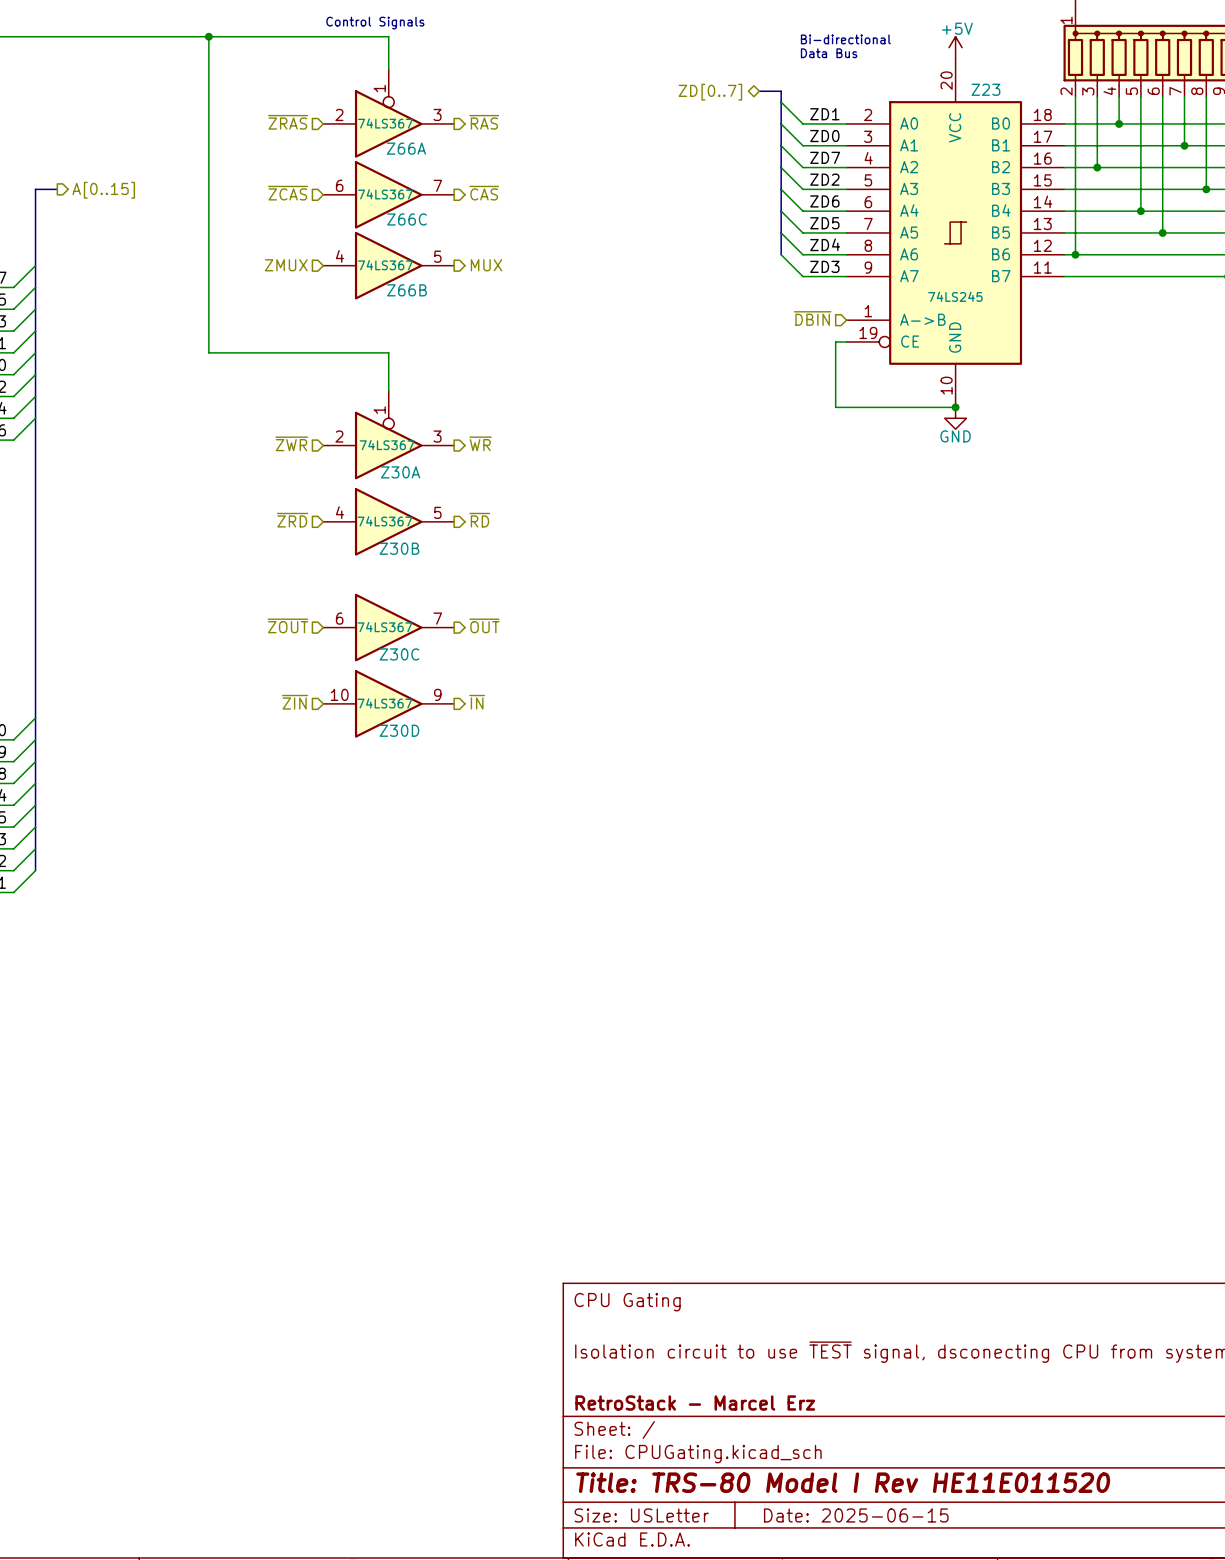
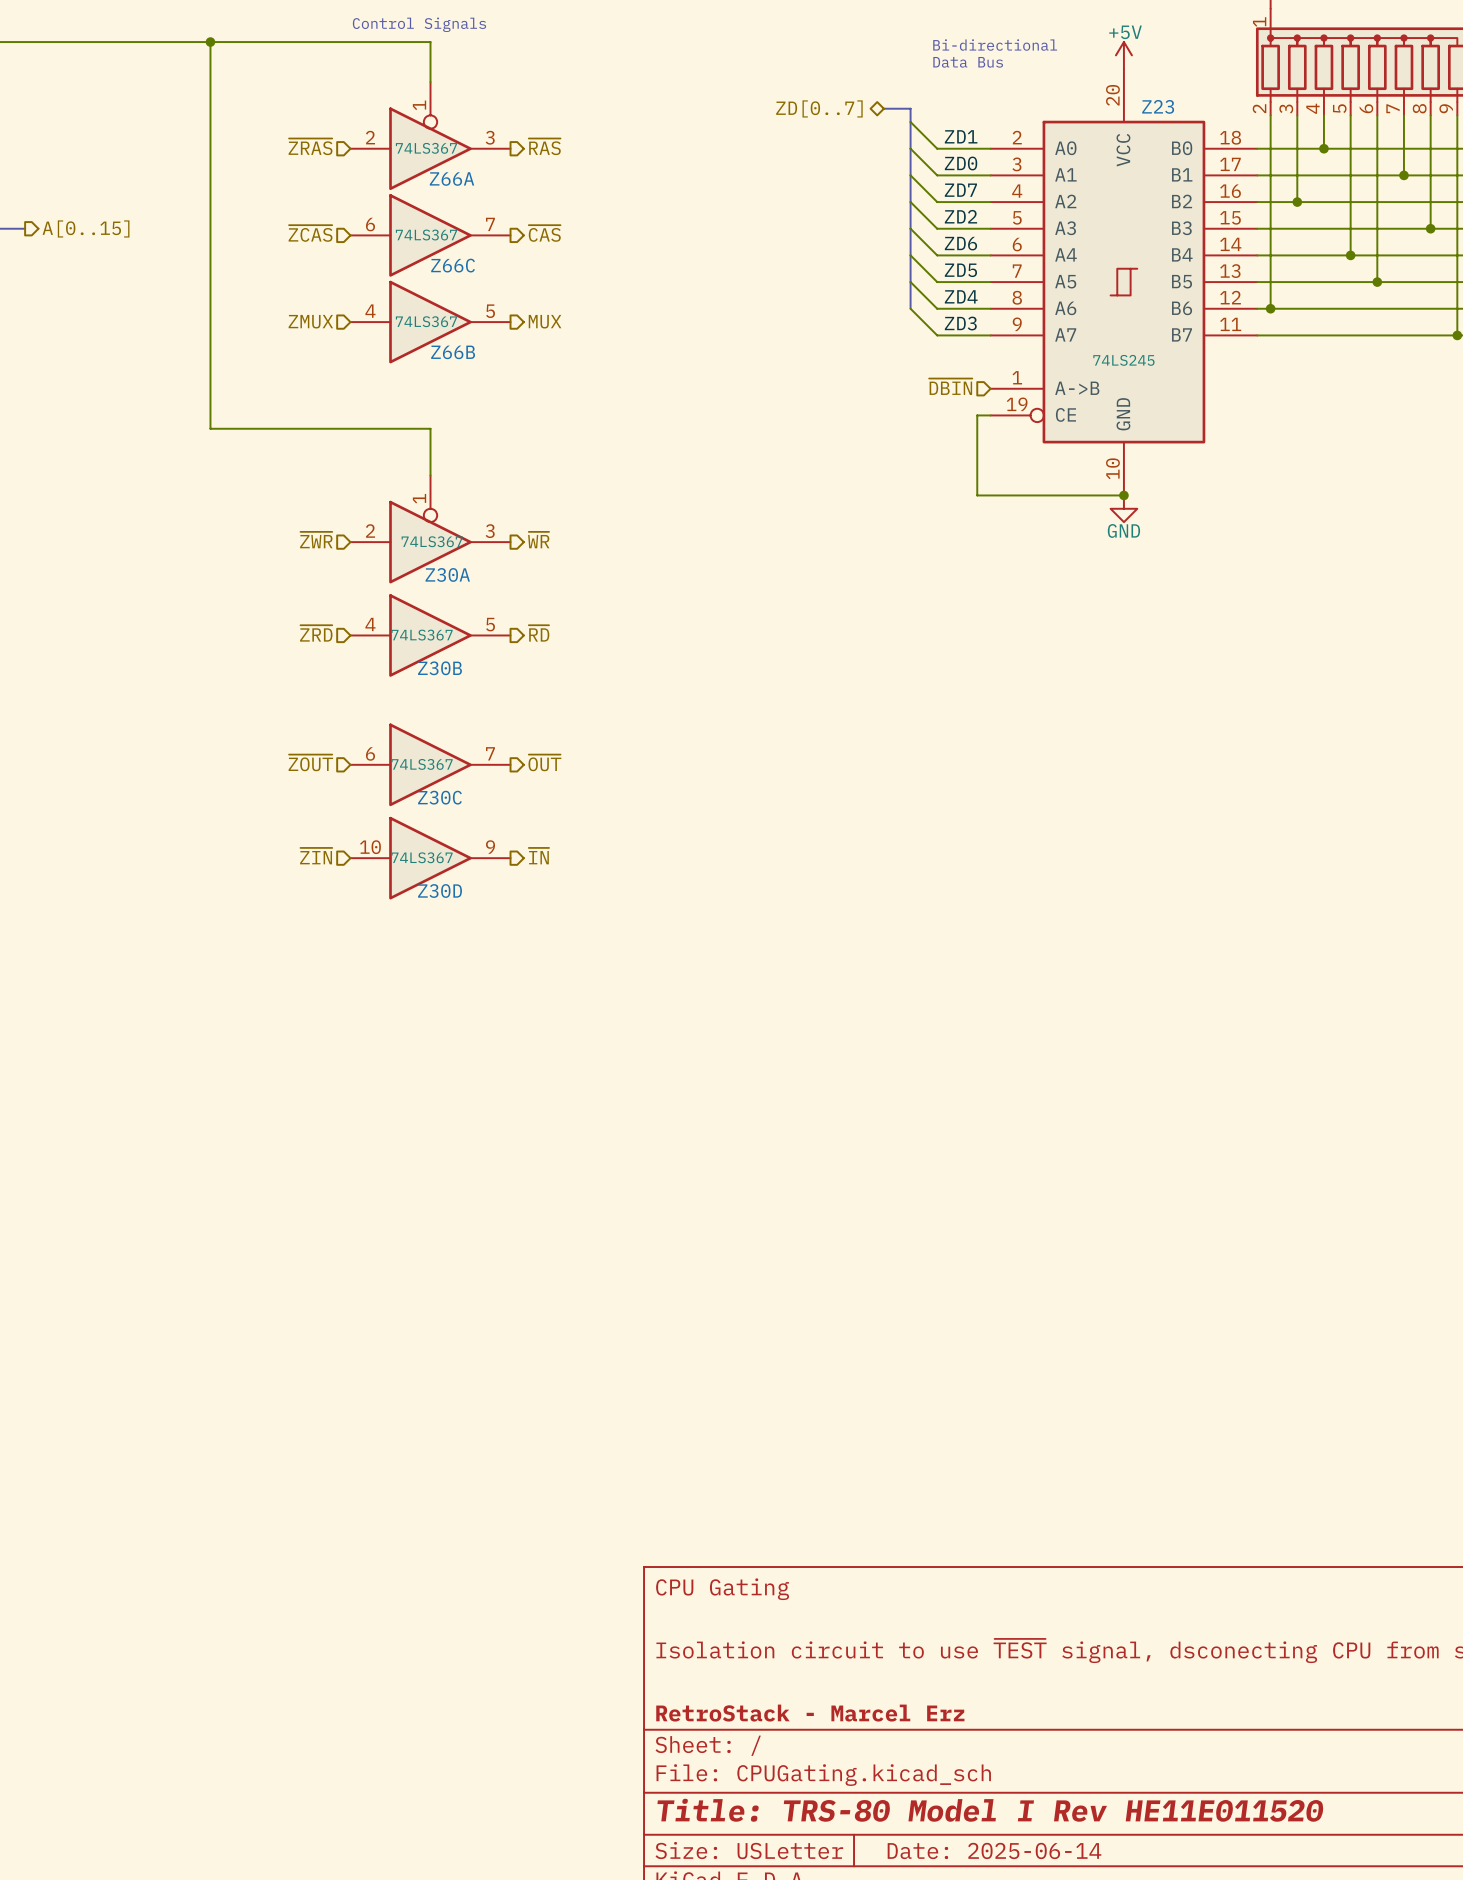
title block: Date: 2025-06-15 (856, 1515) -> Date: 2025-06-14 (994, 1850)

